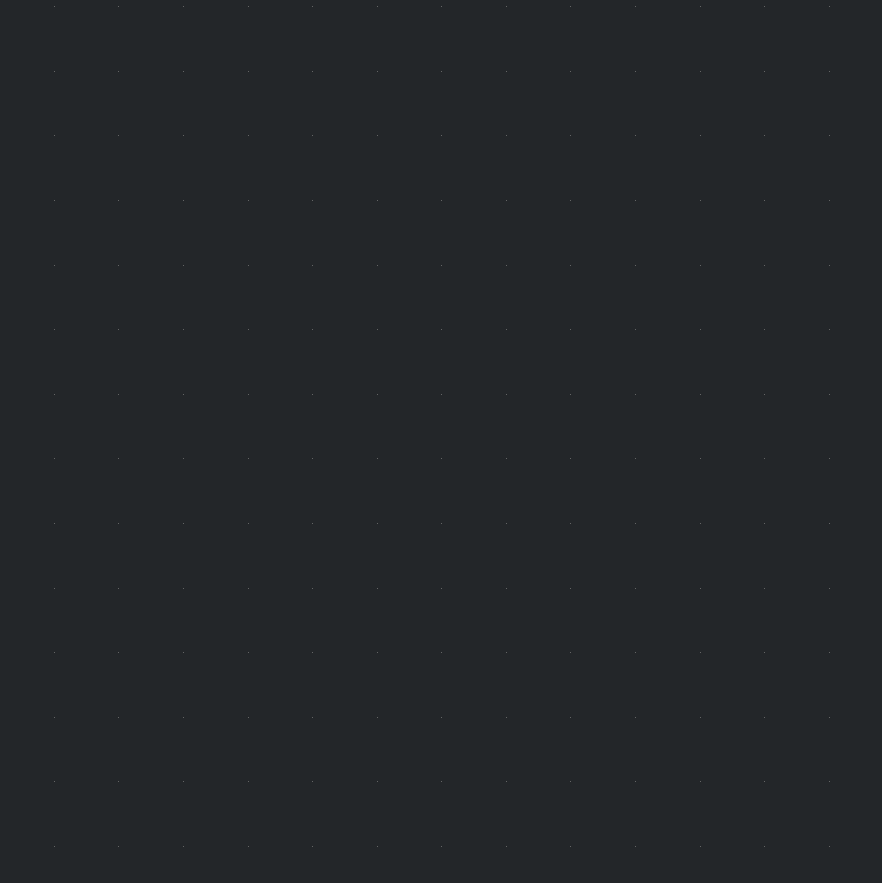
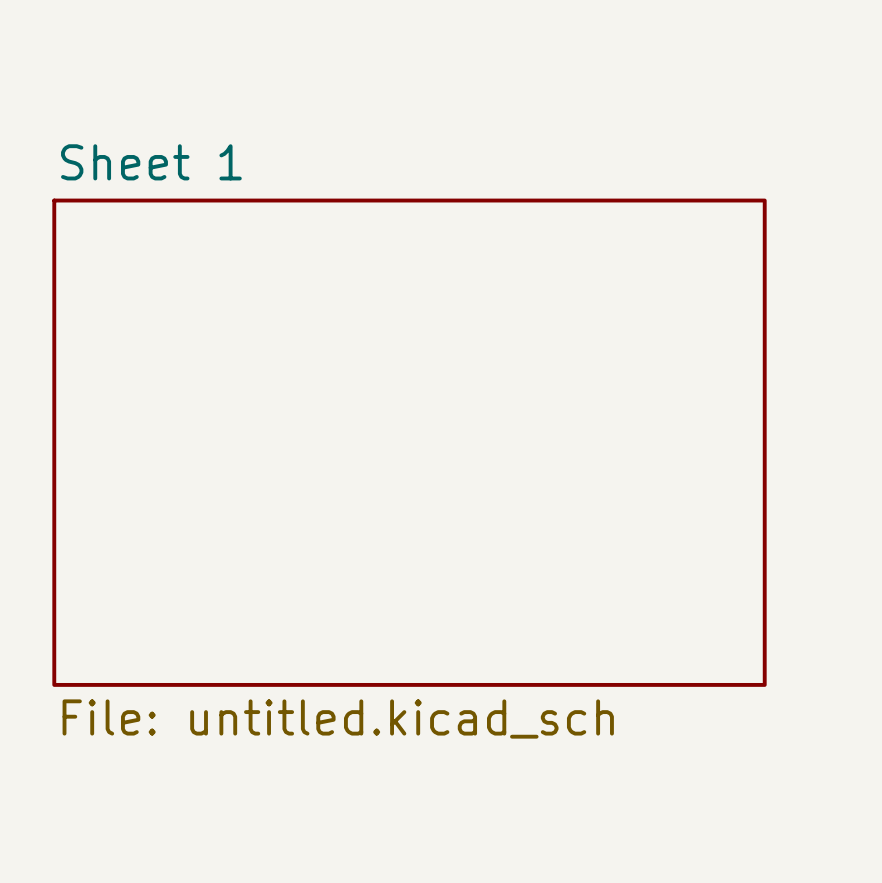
sheet Sheet 1: none -> File: untitled.kicad_sch (409, 442)

